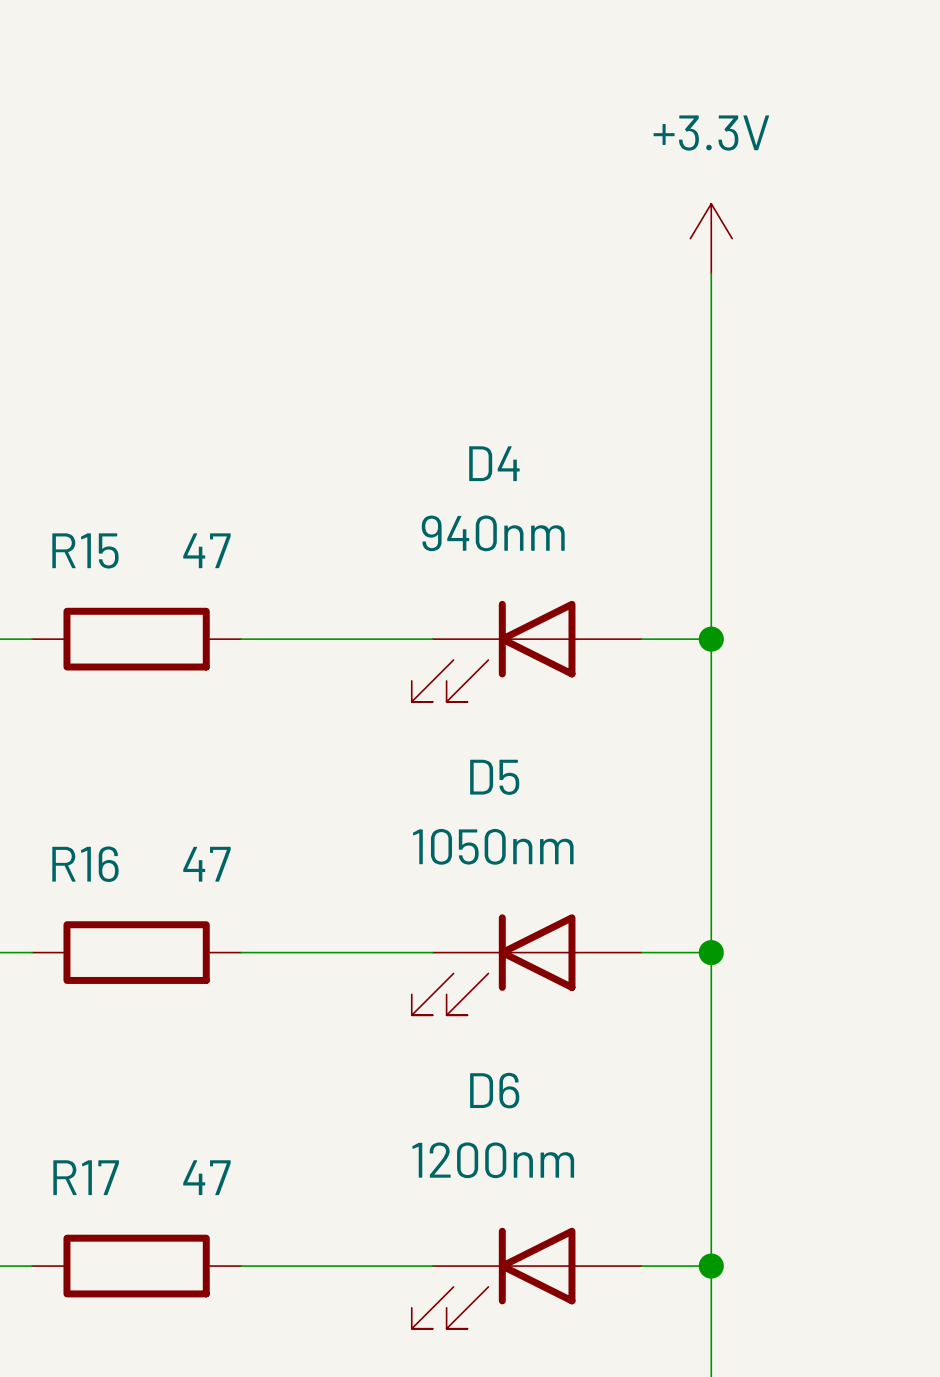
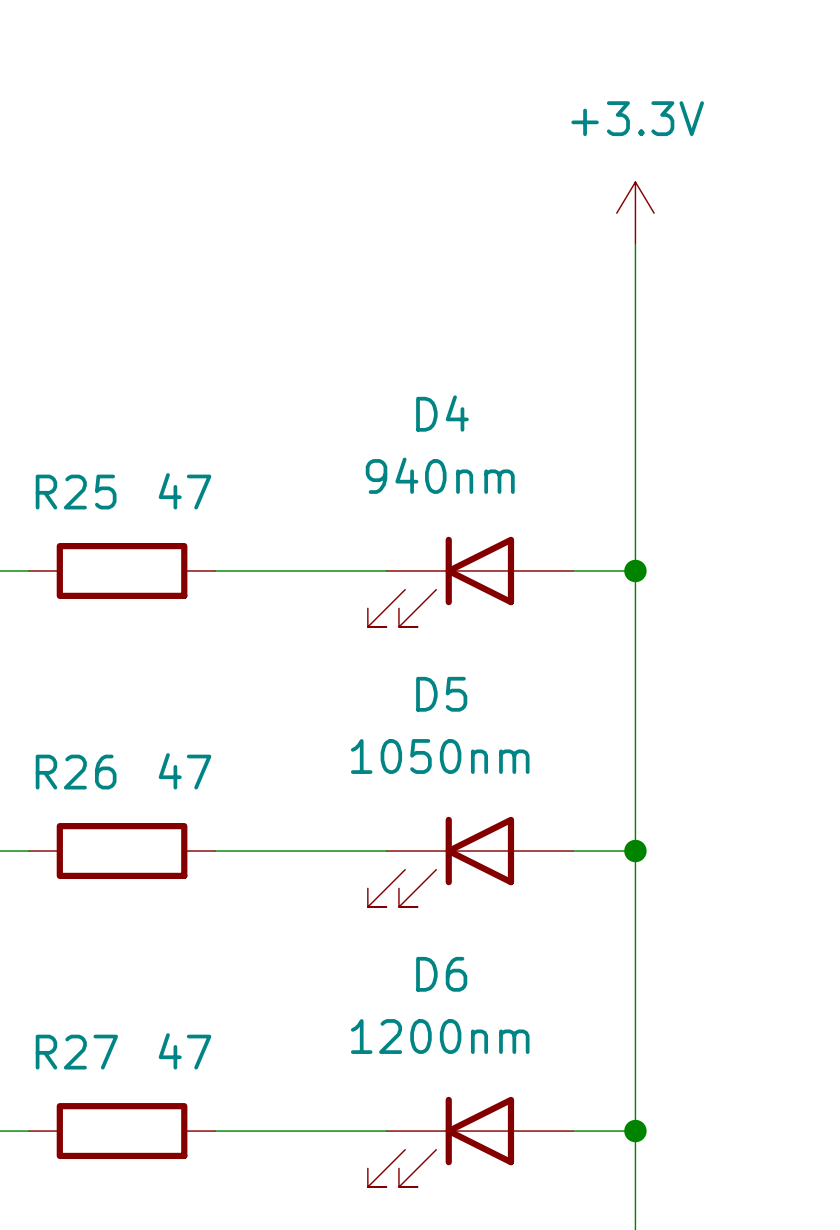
R15 name: R15 (85, 550) -> R25 (76, 492)
R16 name: R16 (85, 864) -> R26 (76, 772)
R17 name: R17 (86, 1177) -> R27 (76, 1052)

